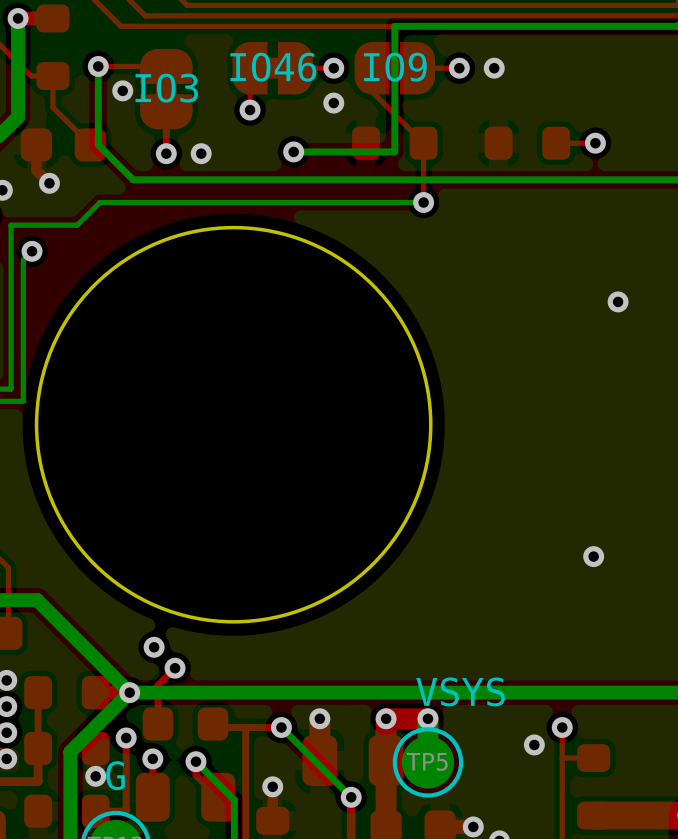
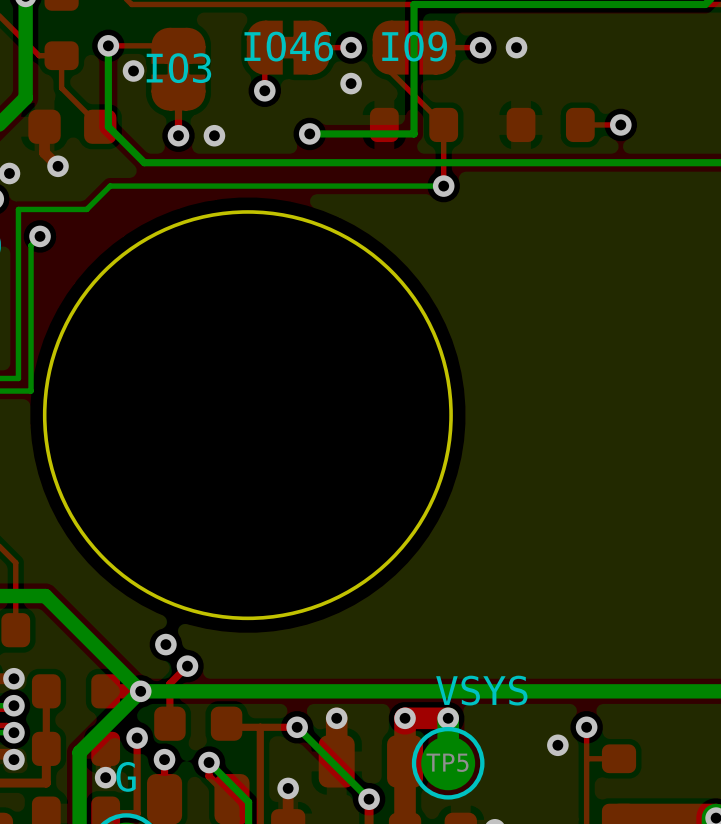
via: (618, 301) -> none
via: (593, 556) -> none

